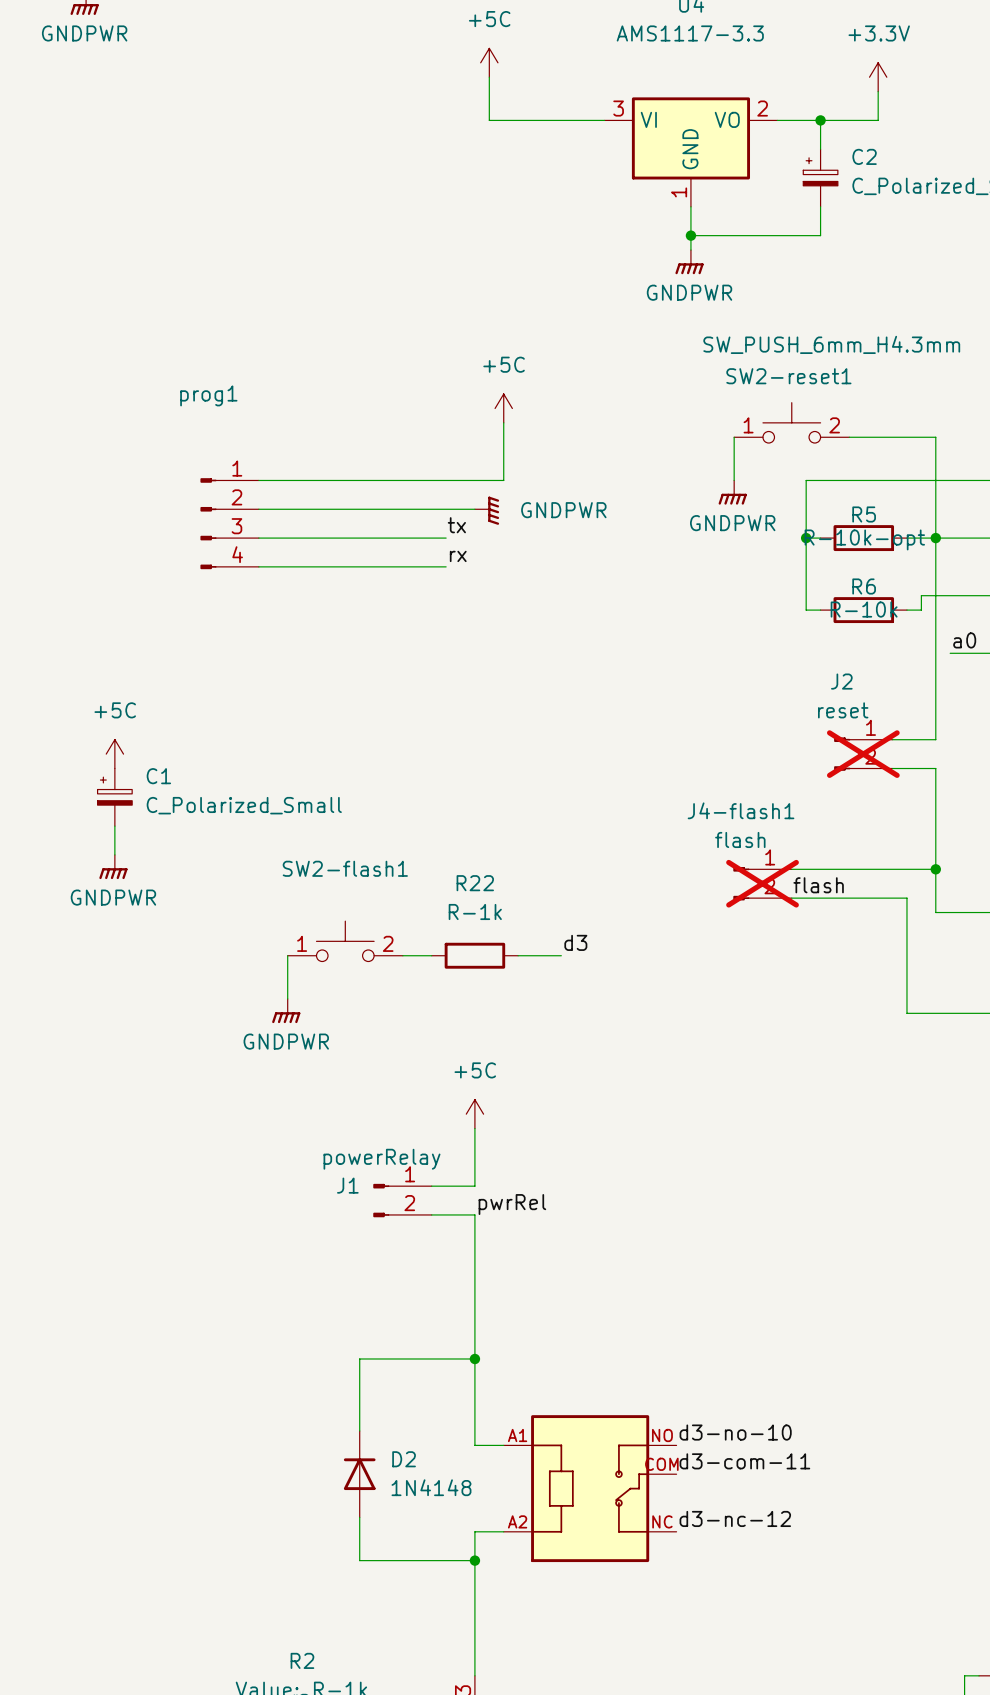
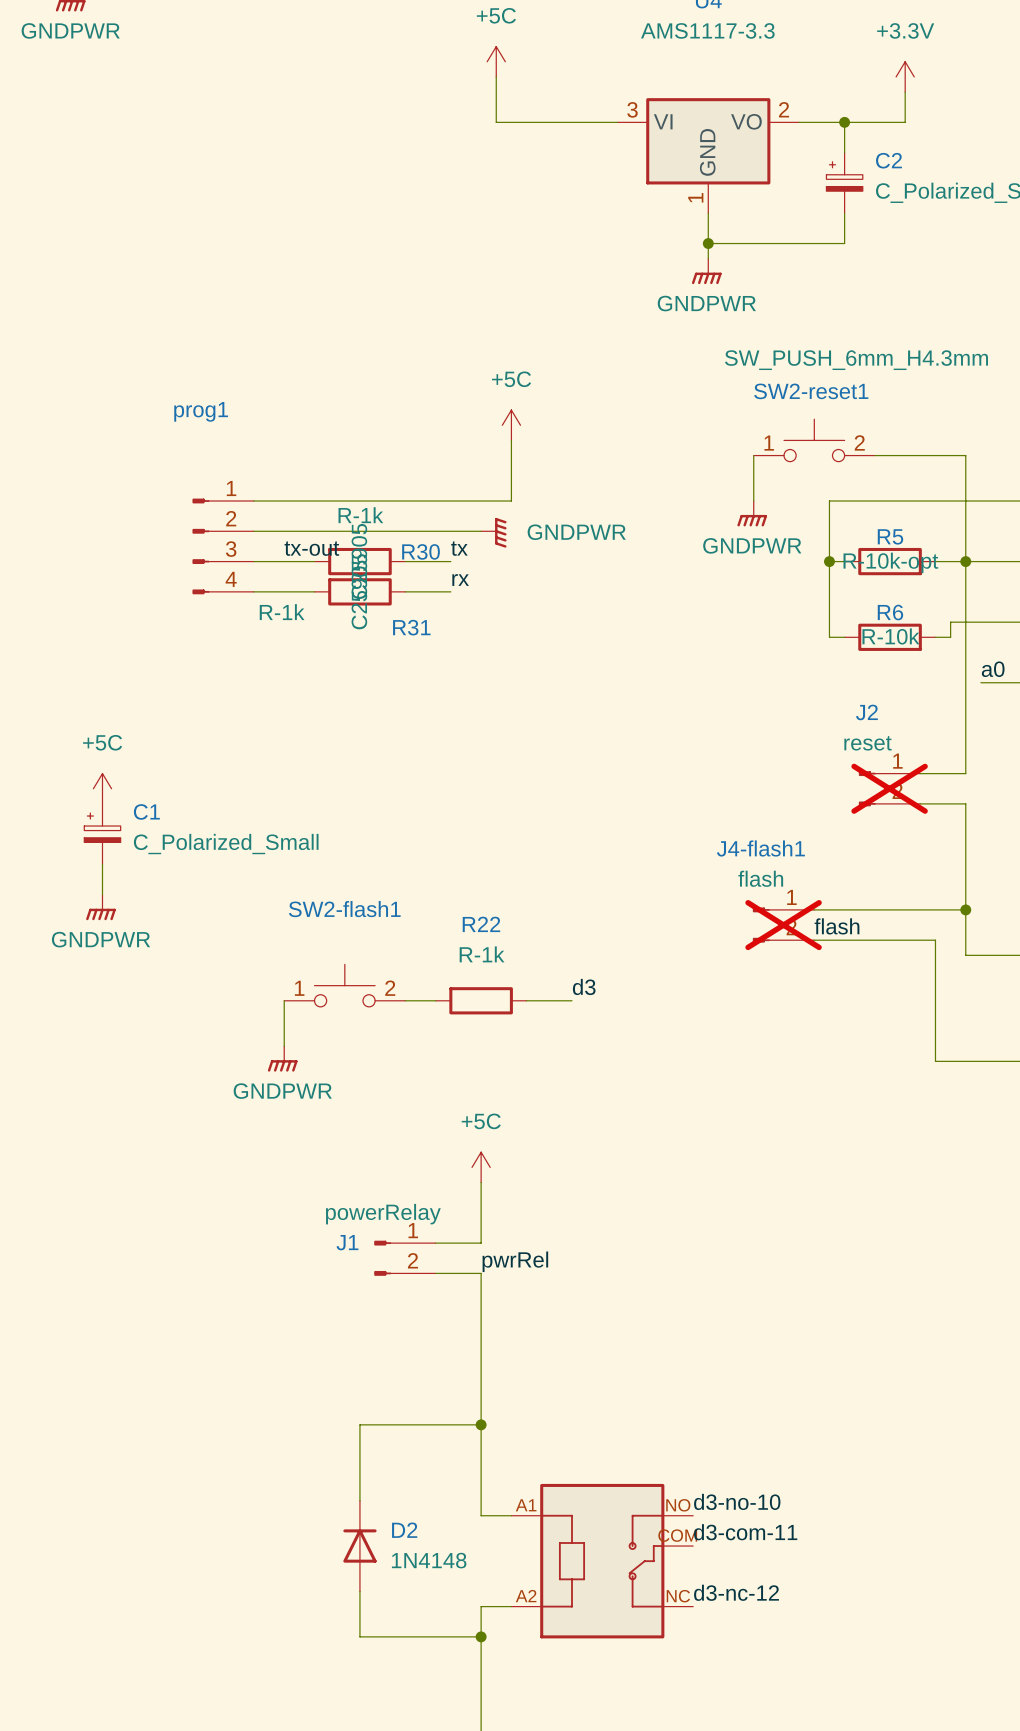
label: none -> tx-out (311, 548)
wire: (316, 538) (402, 538) -> none
R30: none -> R-1k (359, 561)
wire: (316, 566) (402, 566) -> none
R31: none -> R-1k (359, 591)

